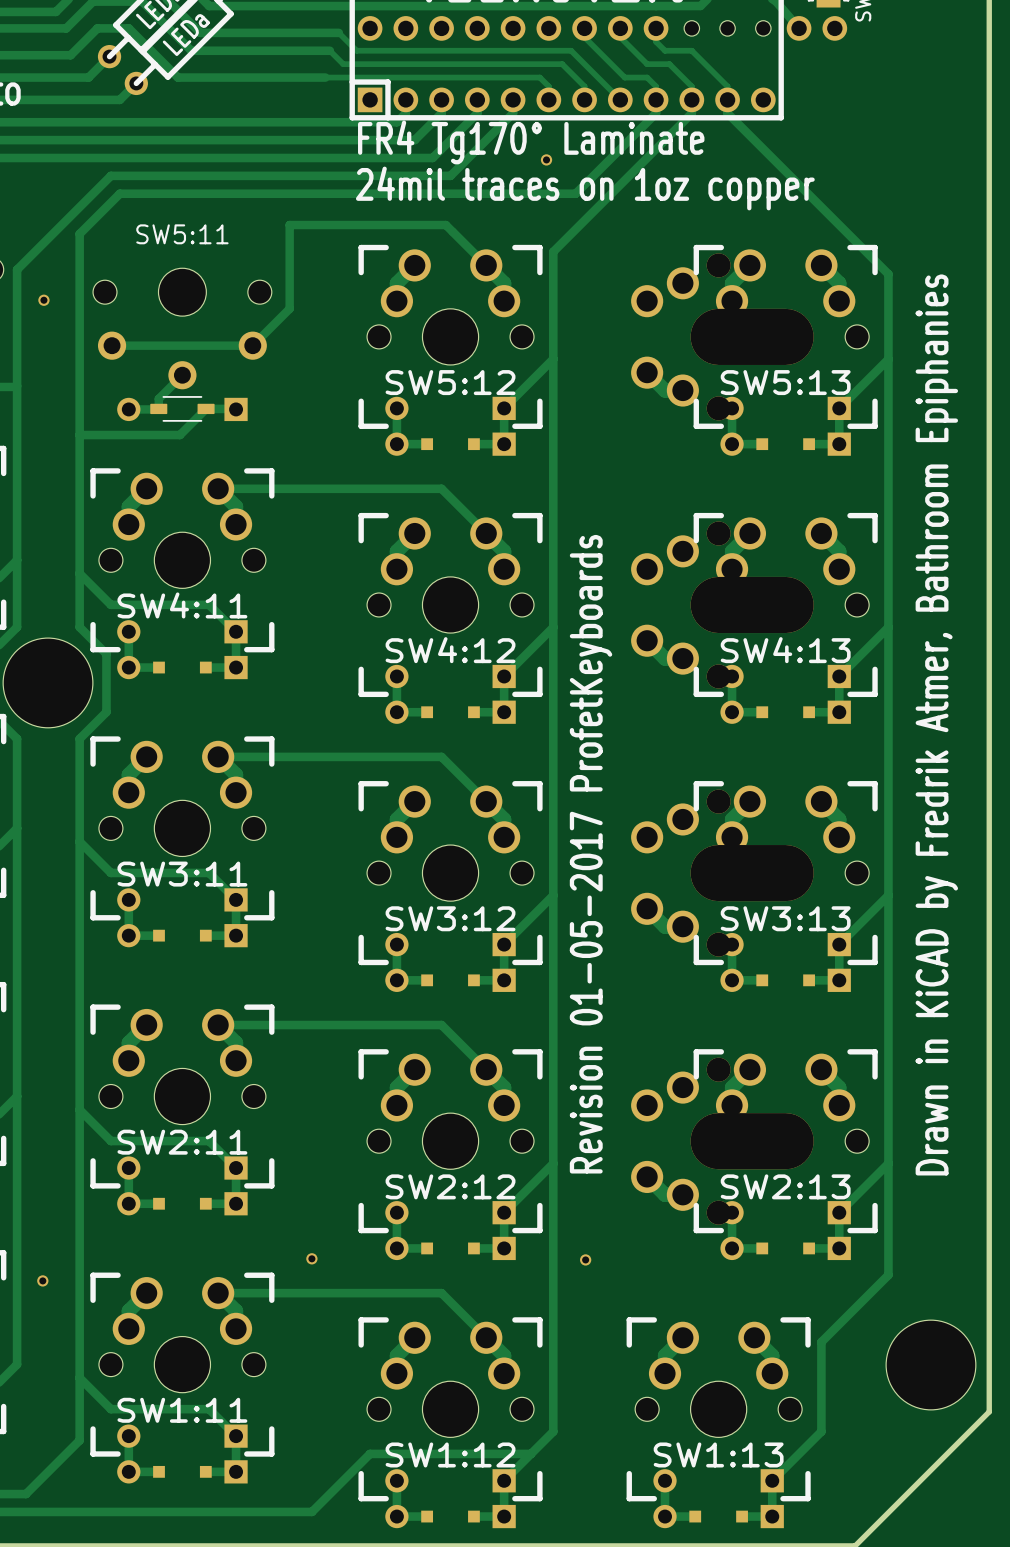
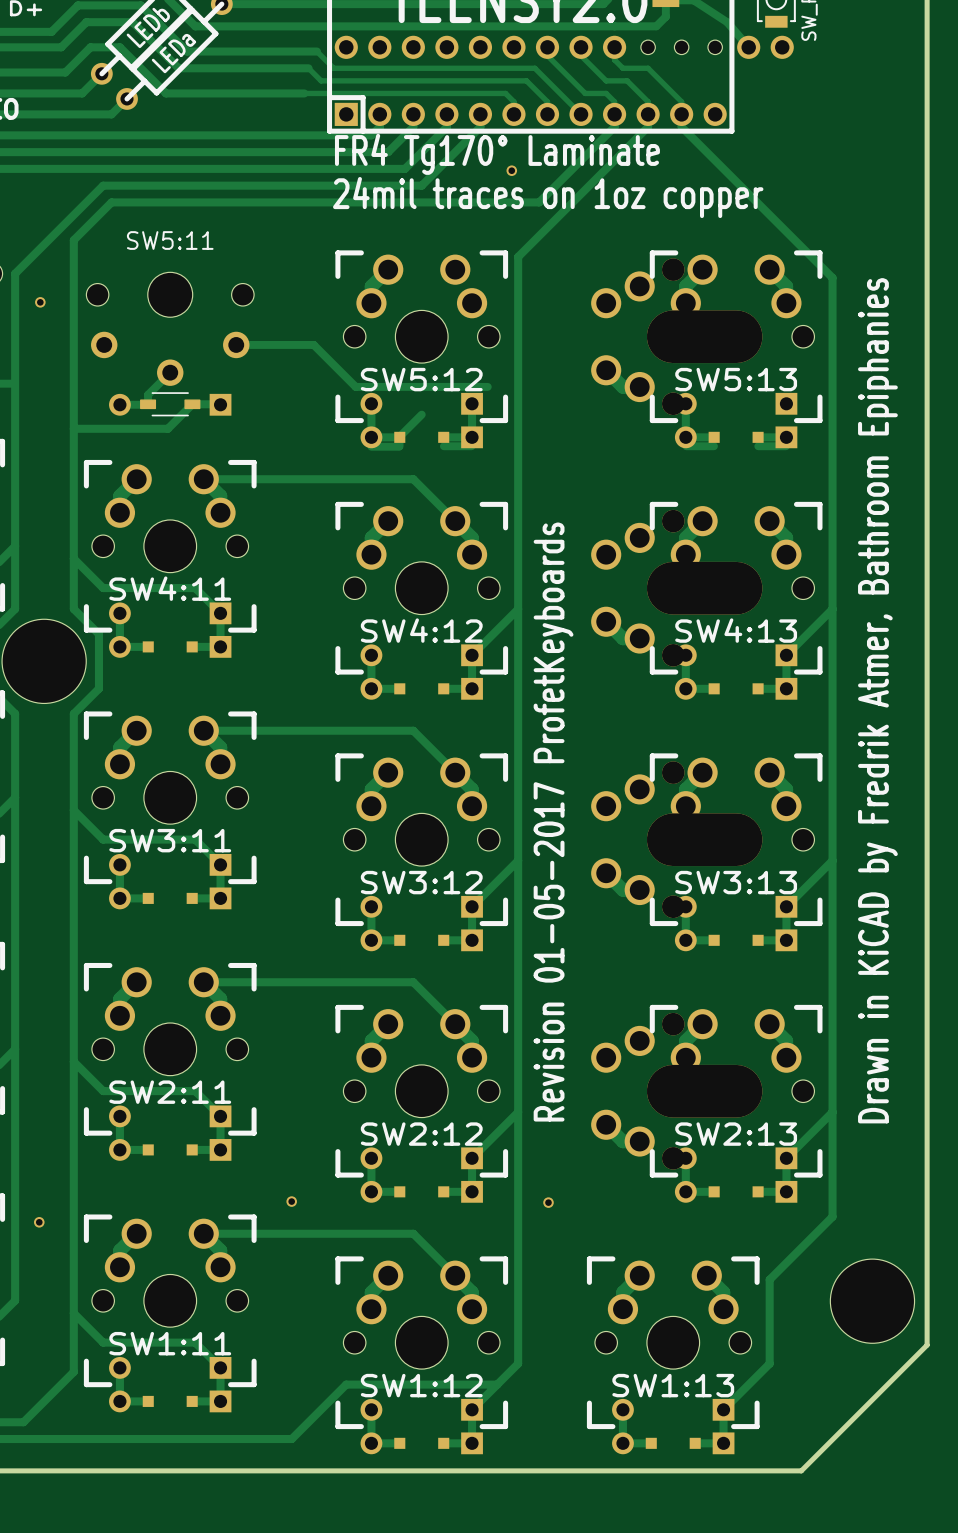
track: (504, 301) (504, 283) (445, 225) (289, 225) (289, 308) (252, 345) (112, 345) -> none
track: none -> (236, 344) (313, 344) (355, 386) (487, 386)
track: (553, 359) (504, 408) -> none
track: (888, 359) (839, 408) (839, 444) -> none
track: none -> (421, 414) (399, 436) (399, 446)
track: none -> (443, 446) (471, 446)
track: none -> (686, 446) (713, 446)
track: none -> (758, 446) (785, 446)
track: none -> (371, 446) (399, 446)

